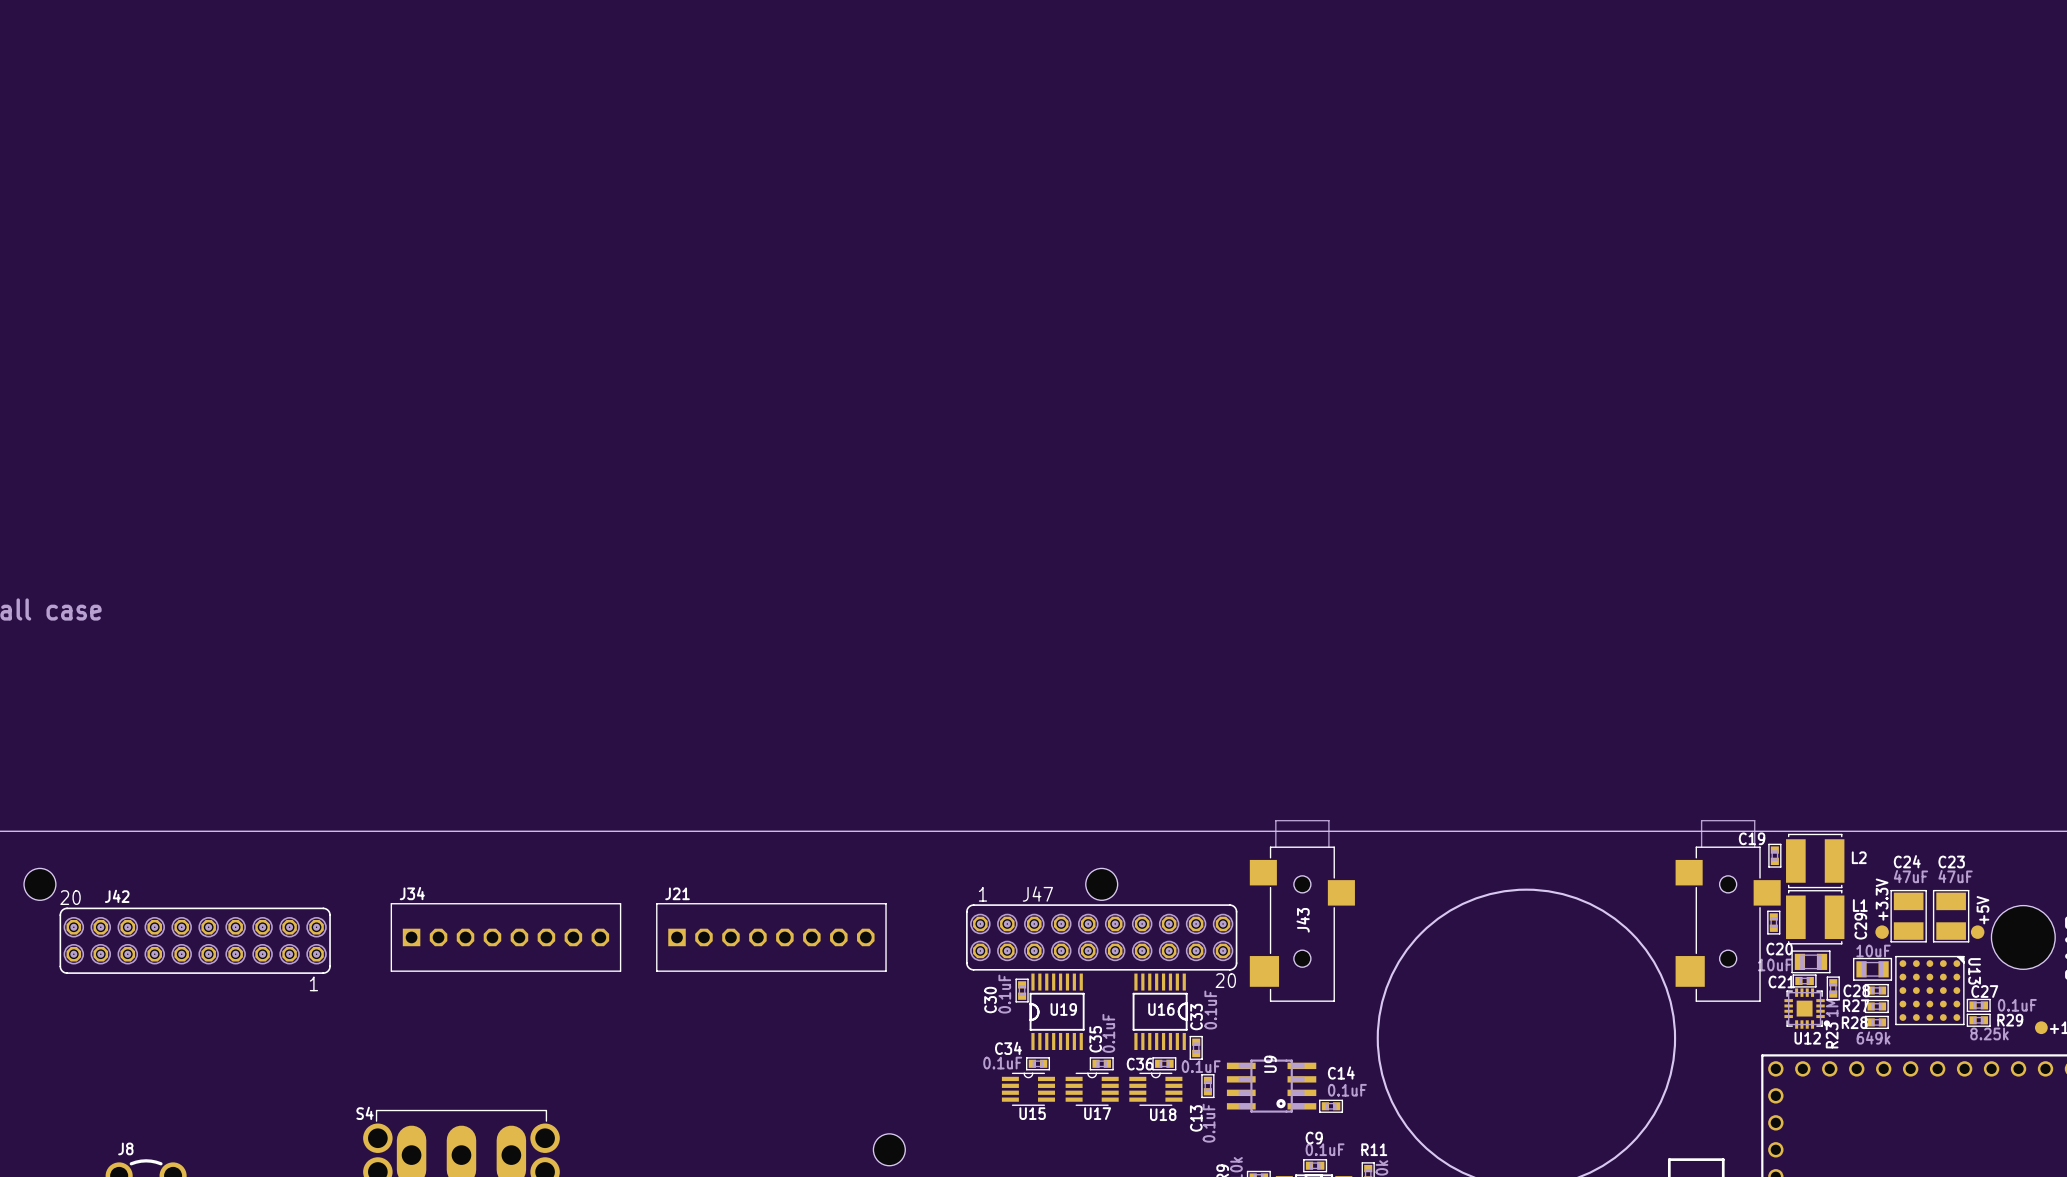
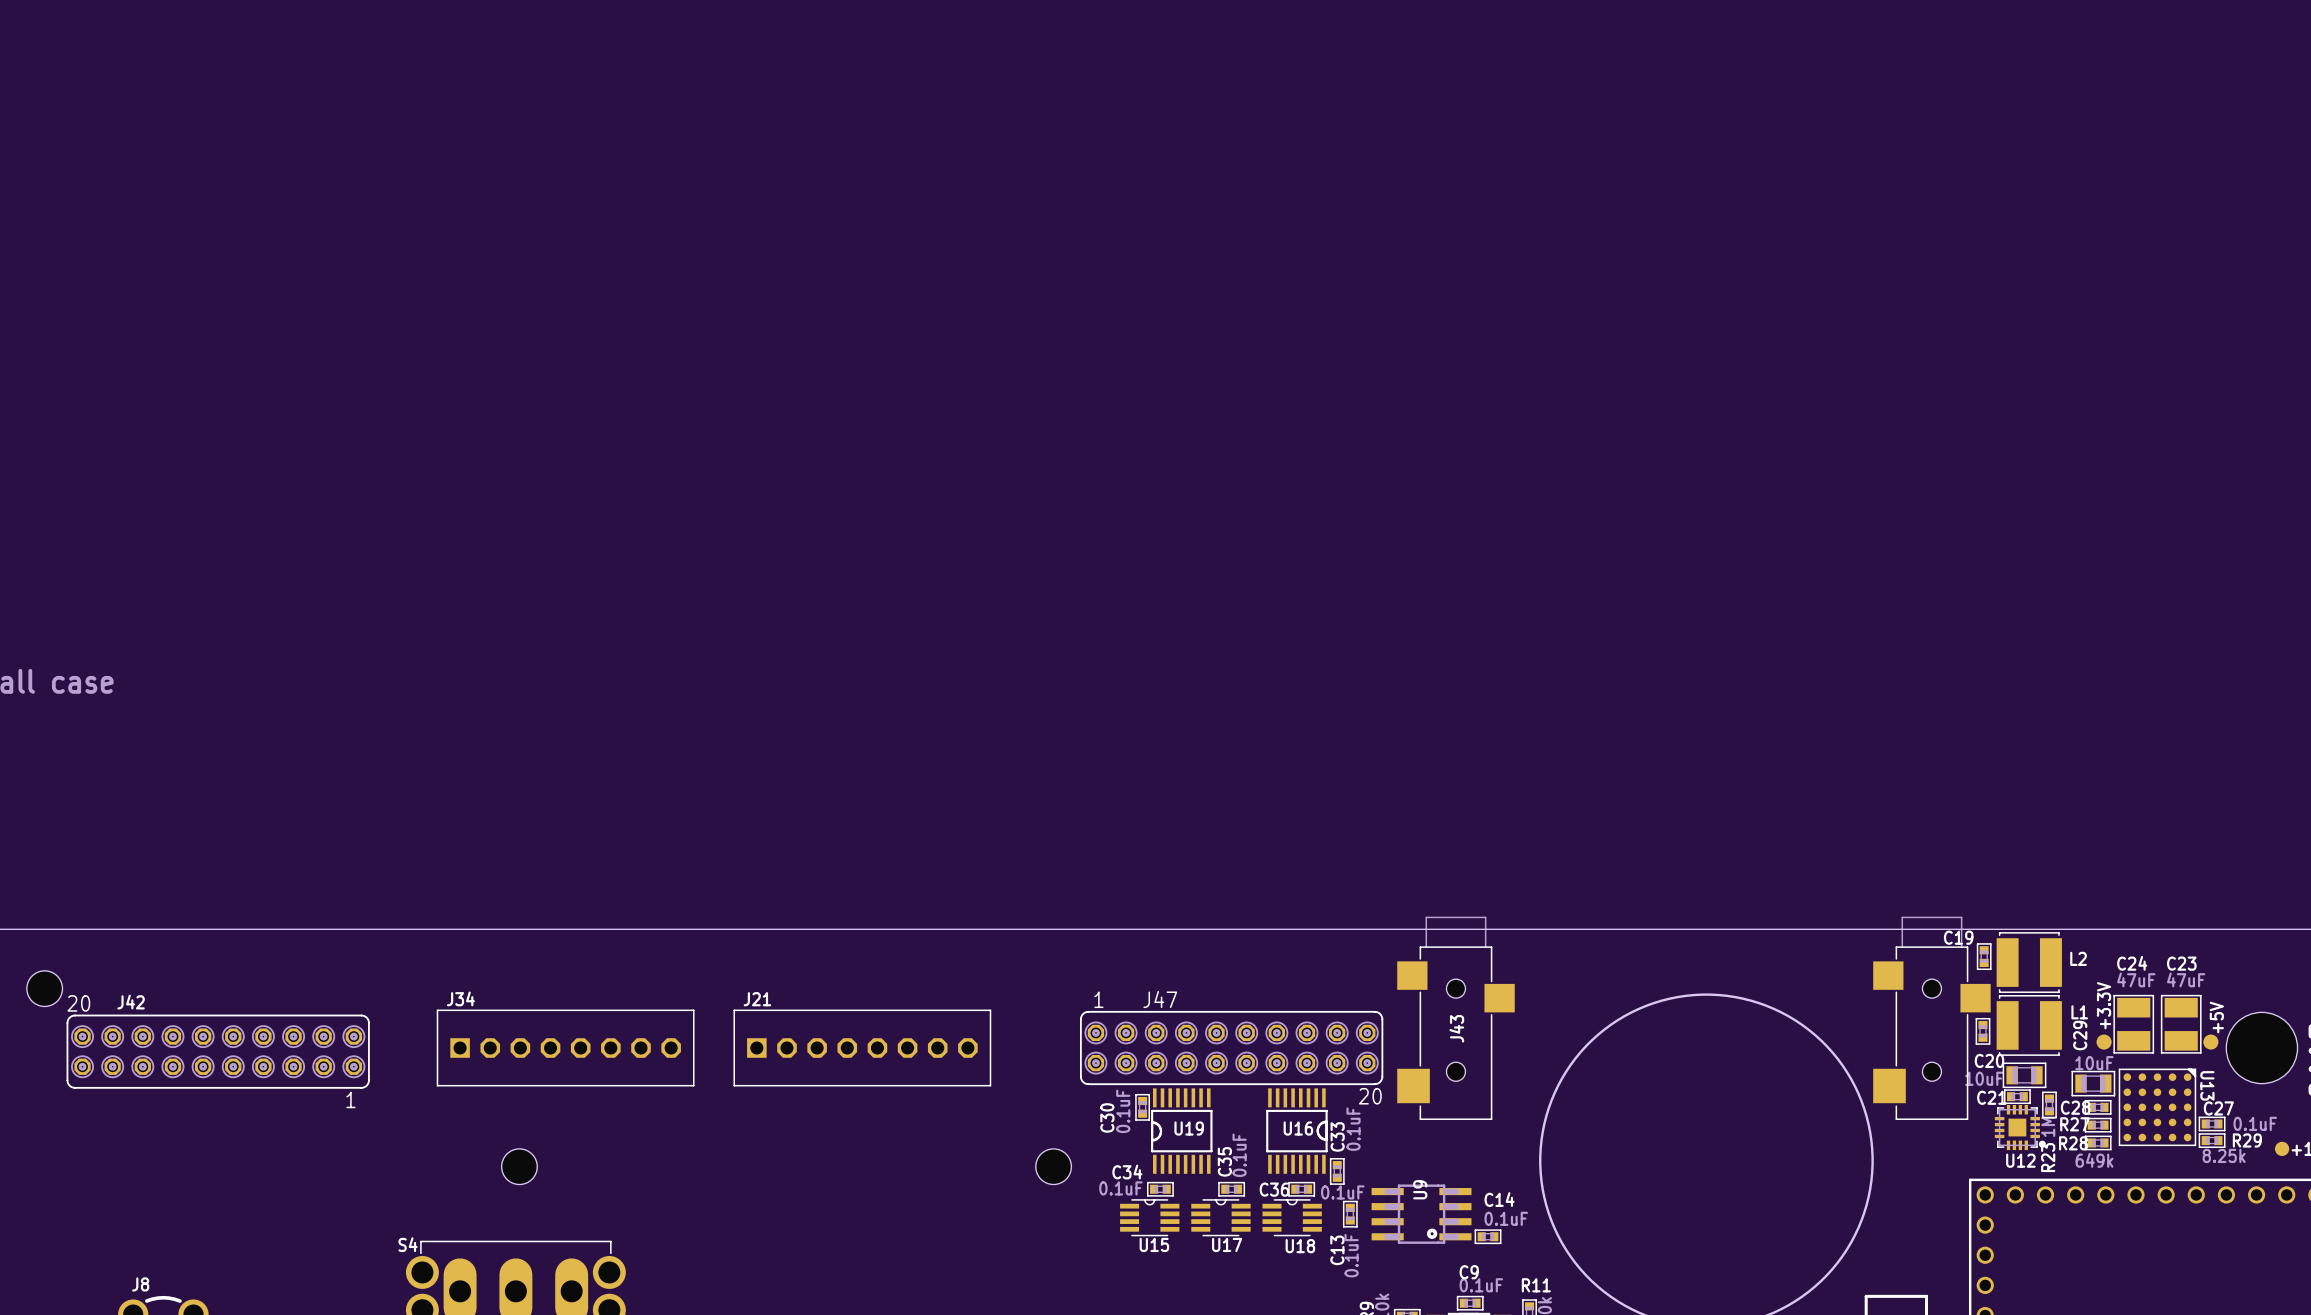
hole: (1101, 884) -> none
hole: none -> (519, 1166)
hole: none -> (1053, 1166)
hole: (889, 1149) -> none

